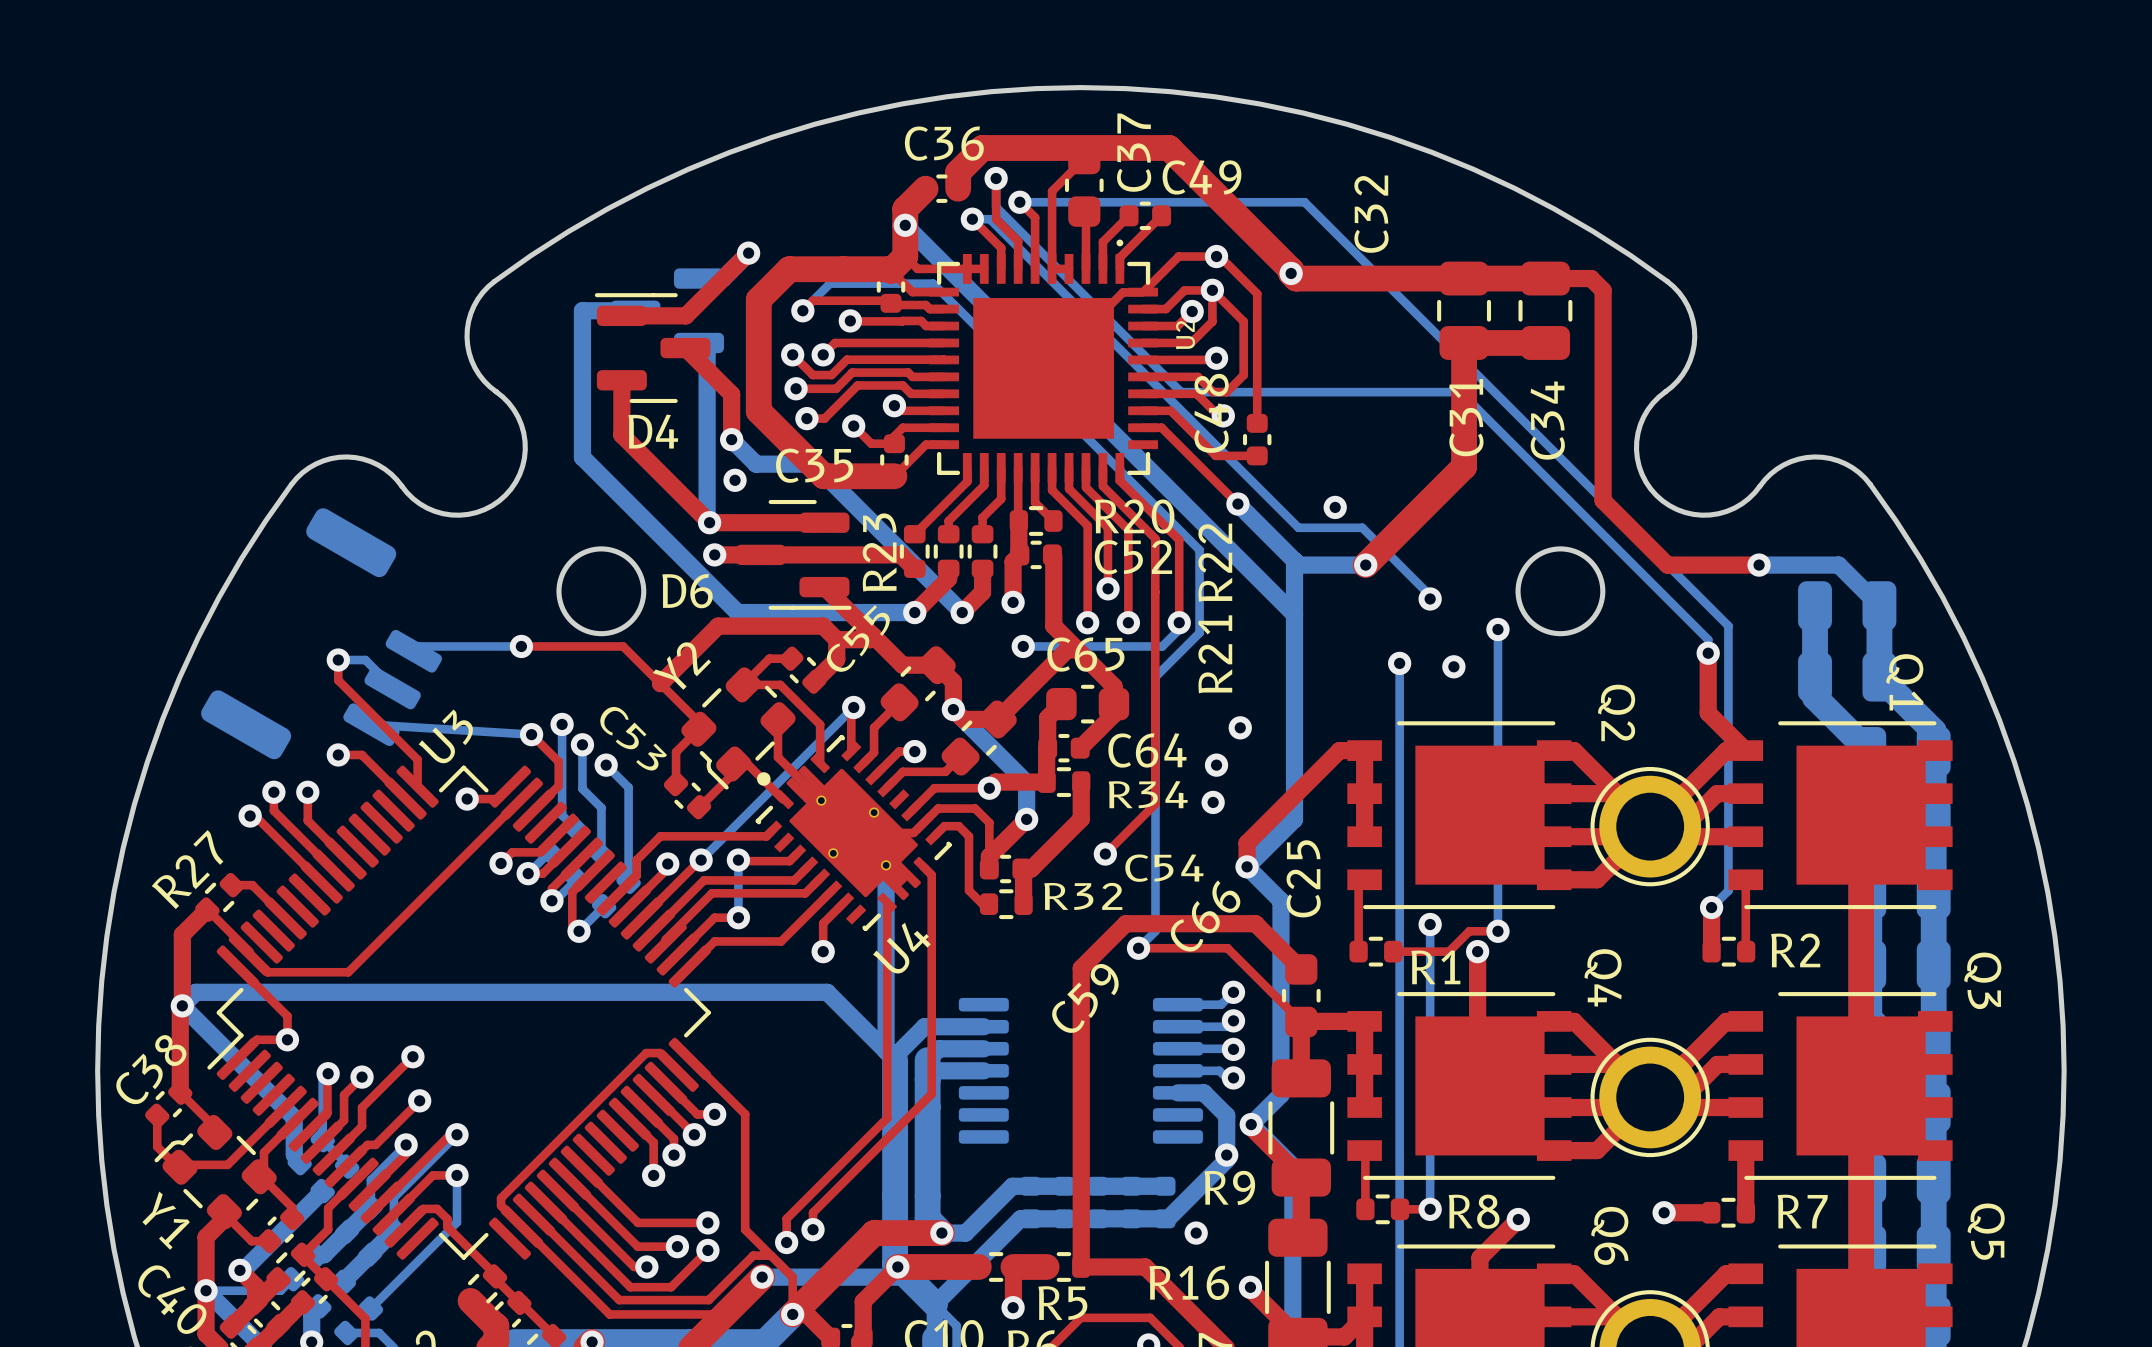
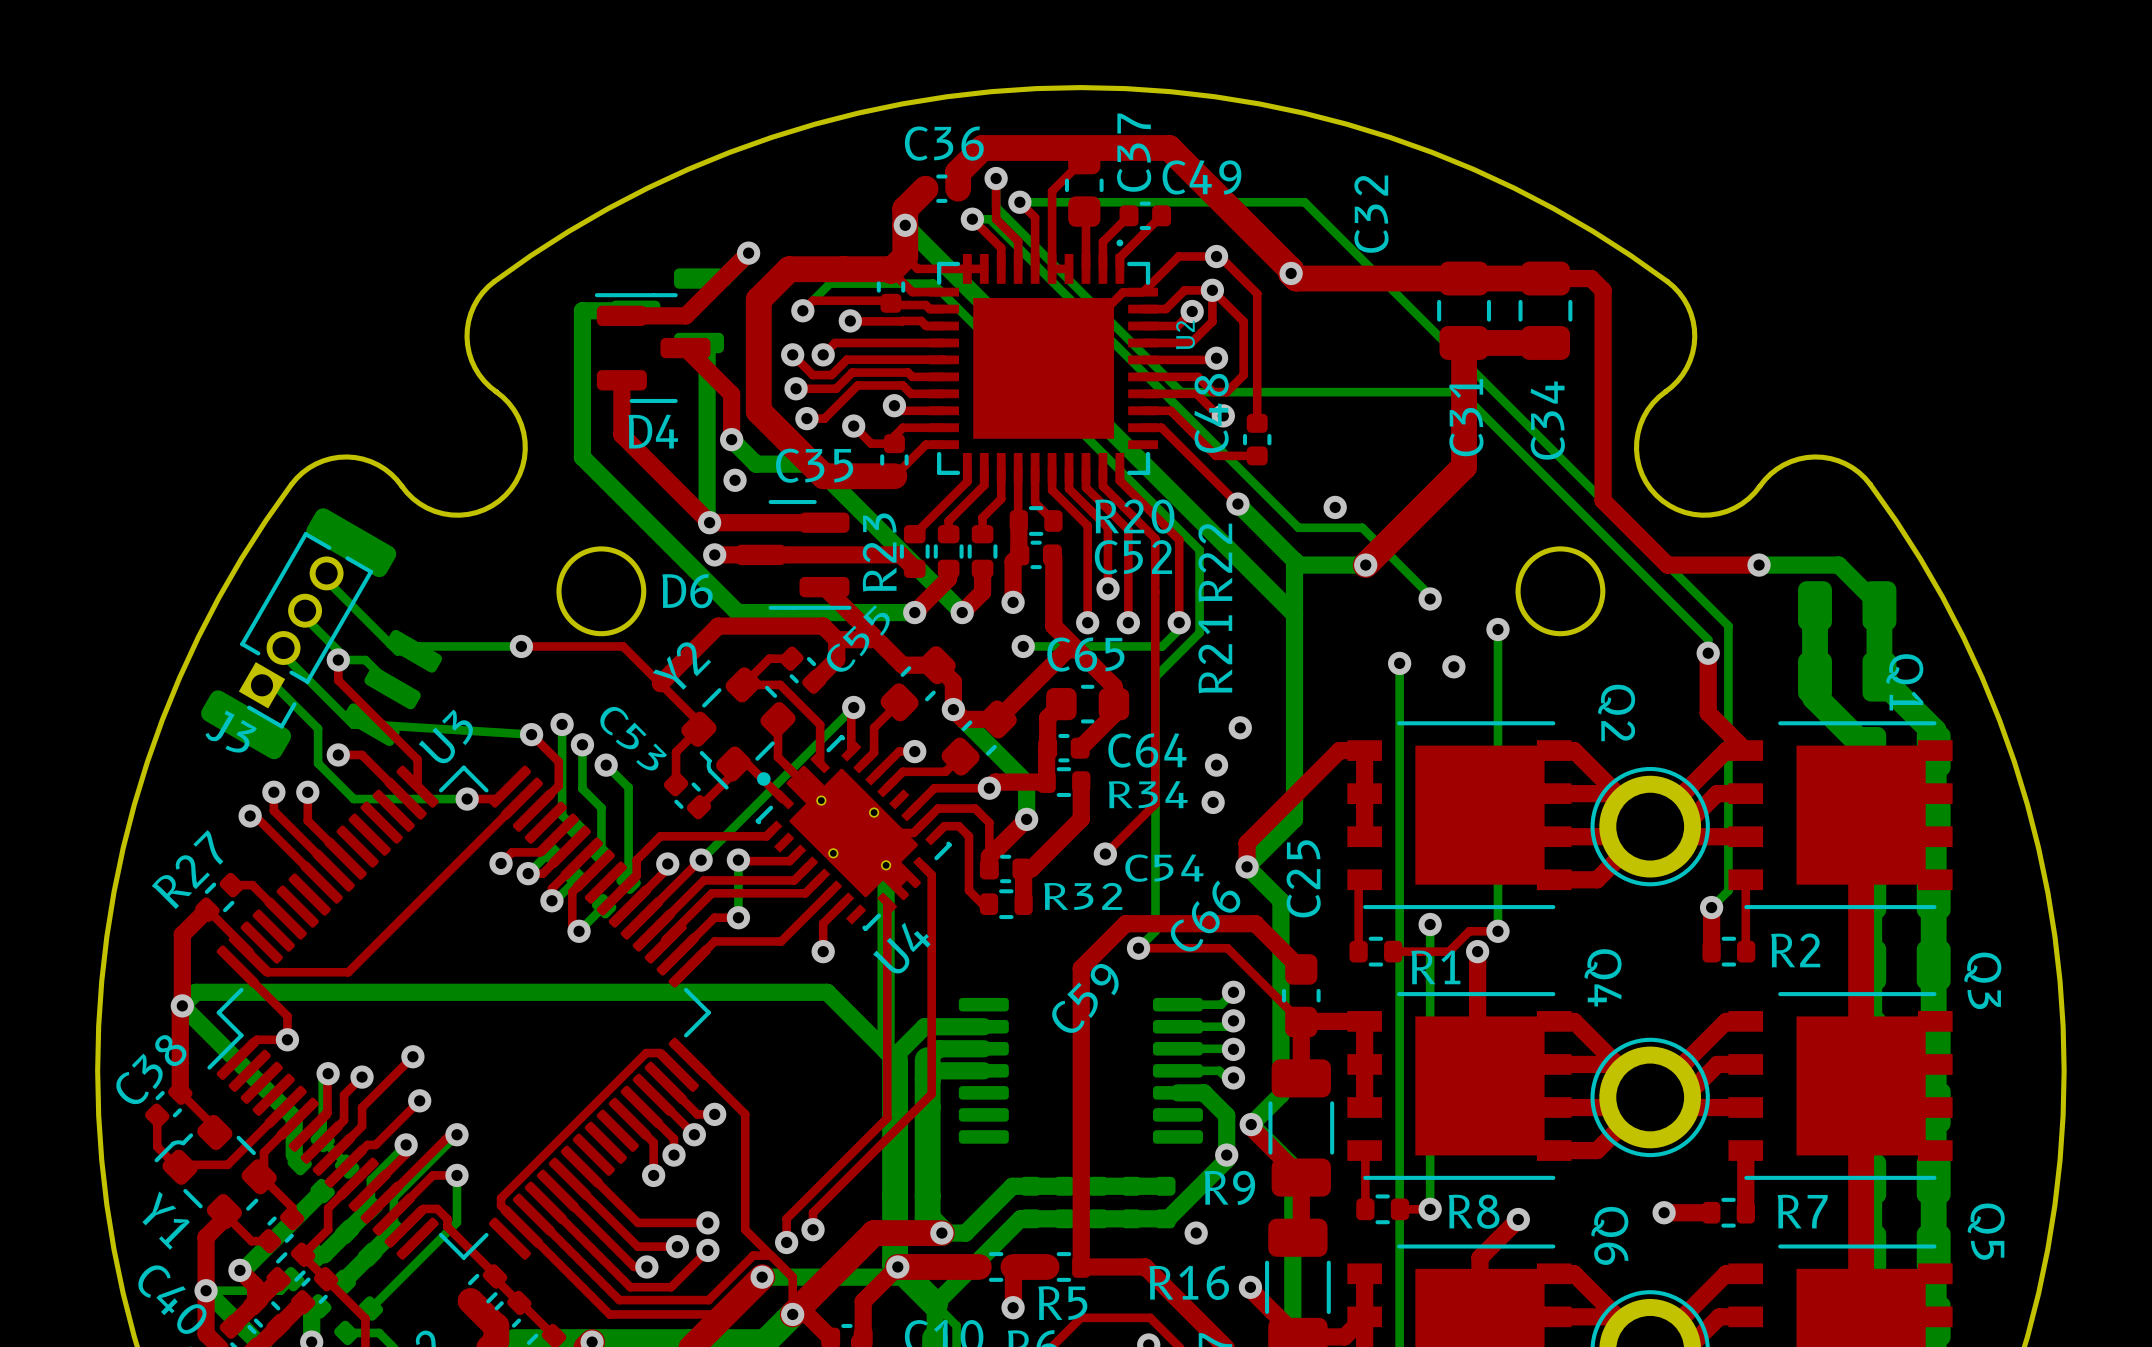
bottom track: none -> (321, 575) (397, 651) (413, 651)
bottom track: none -> (299, 612) (338, 650) (338, 660)
J3: none -> (305, 630)
bottom track: none -> (278, 649) (353, 724) (371, 724)
bottom track: none -> (256, 687) (276, 687) (318, 728) (318, 763) (353, 799) (467, 799)

